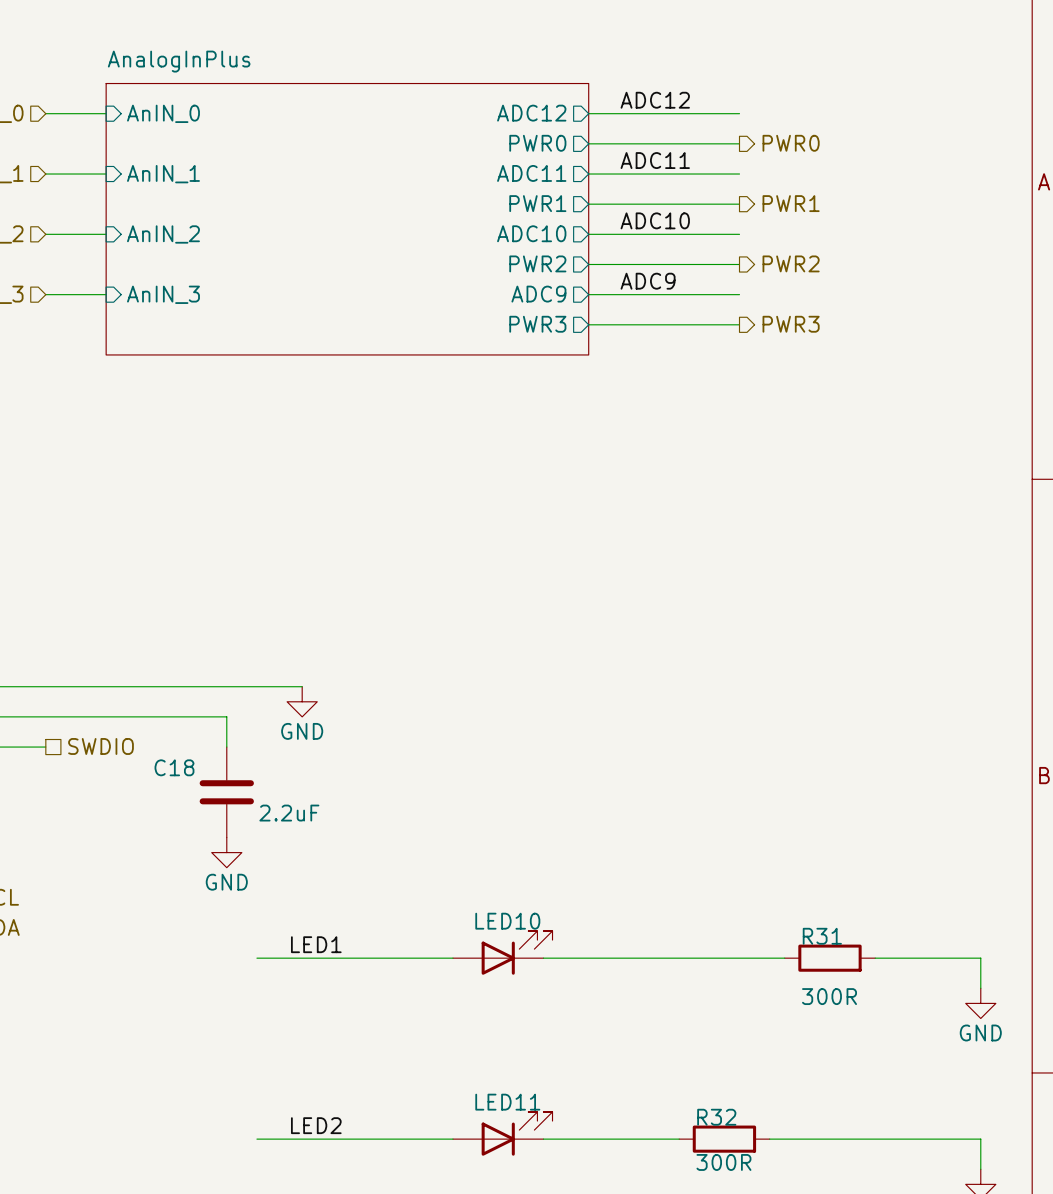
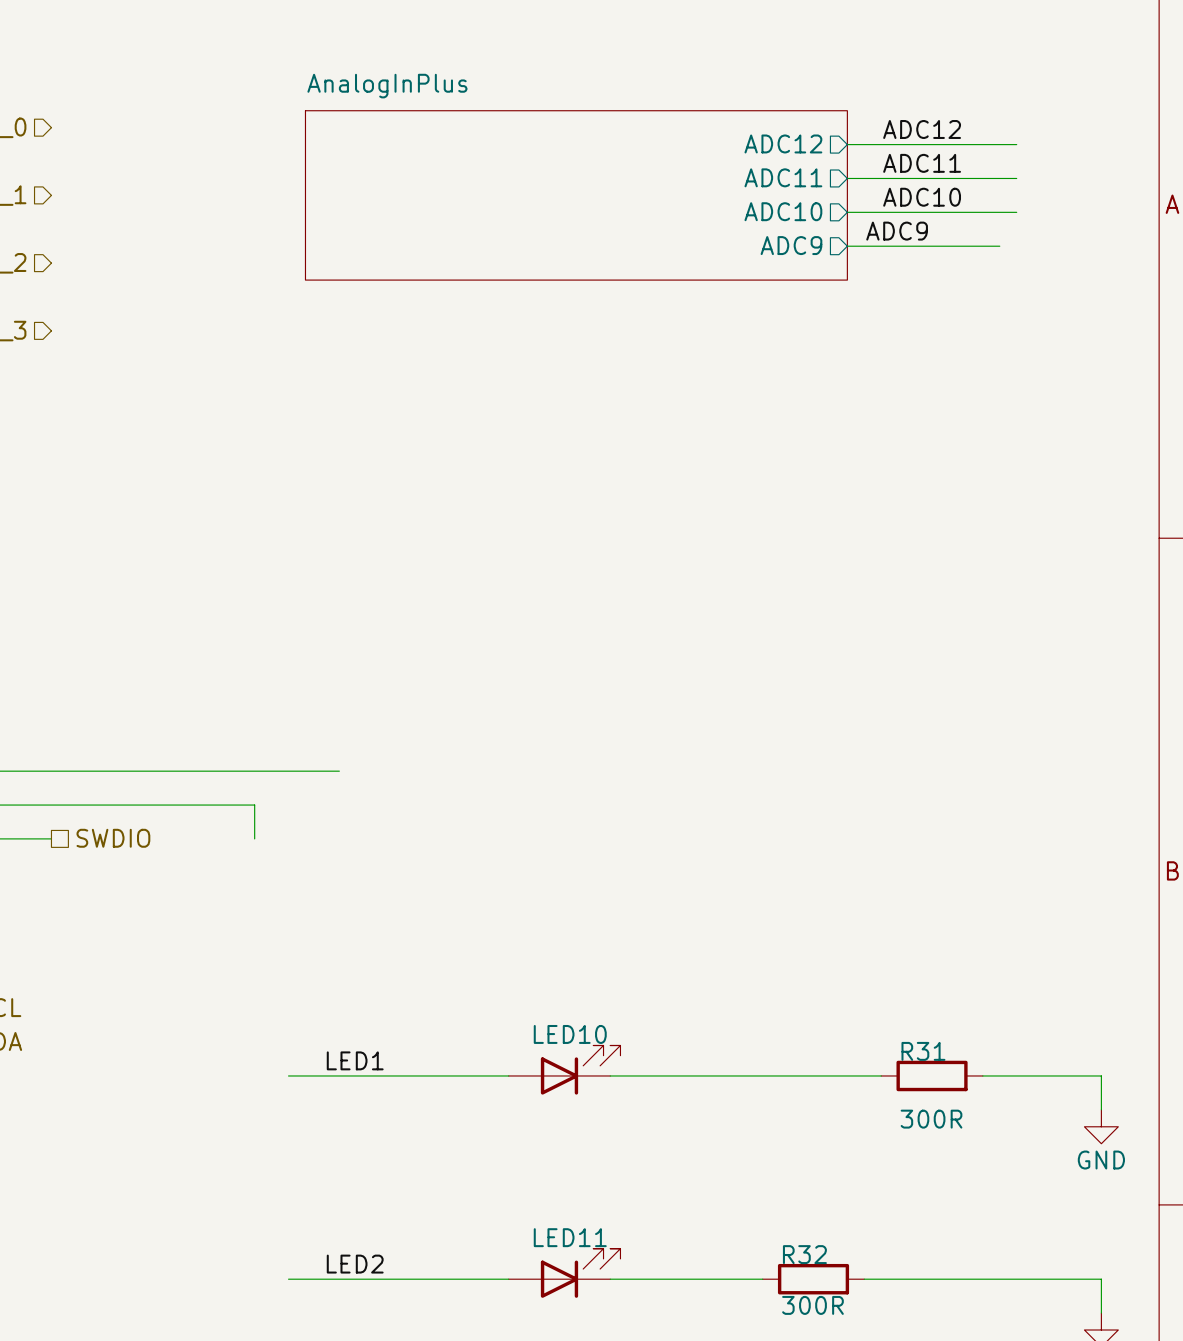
label position: ADC12 (655, 100) -> ADC12 (922, 129)
wire: (45, 113) (106, 113) -> none
sheet pin: AnIN_0 (163, 113) -> none
sheet pin position: ADC12 (531, 113) -> ADC12 (783, 143)
wire: (588, 113) (739, 113) -> (847, 144) (1016, 144)
sheet pin: PWR0 (537, 143) -> none
wire: (588, 143) (739, 143) -> (847, 178) (1016, 178)
hierarchical label: PWR0 (791, 143) -> none
label position: ADC11 (655, 160) -> ADC11 (922, 163)
sheet pin position: ADC11 (531, 173) -> ADC11 (783, 177)
wire: (45, 174) (106, 174) -> none
sheet pin: AnIN_1 (163, 174) -> none
sheet AnalogInPlus: none -> (576, 195)
wire: (588, 174) (739, 174) -> (847, 212) (1016, 212)
sheet pin: PWR1 (537, 203) -> none
hierarchical label: PWR1 (791, 203) -> none
wire: (588, 204) (739, 204) -> none
sheet AnalogInPlus: (347, 219) -> none
wire: none -> (847, 246) (999, 246)
label position: ADC10 (655, 220) -> ADC10 (922, 197)
sheet pin position: ADC10 (531, 233) -> ADC10 (783, 211)
wire: (45, 234) (106, 234) -> none
sheet pin: AnIN_2 (163, 234) -> none
wire: (588, 234) (739, 234) -> none
sheet pin: PWR2 (537, 263) -> none
hierarchical label: PWR2 (791, 263) -> none
wire: (588, 264) (739, 264) -> none
label position: ADC9 (648, 281) -> ADC9 (897, 231)
wire: (45, 294) (106, 294) -> none
sheet pin: AnIN_3 (163, 294) -> none
sheet pin position: ADC9 (538, 294) -> ADC9 (791, 245)
wire: (588, 294) (739, 294) -> none
sheet pin: PWR3 (537, 324) -> none
wire: (588, 324) (739, 324) -> none
hierarchical label: PWR3 (791, 324) -> none
power symbol: GND (302, 701) -> none
C18: (226, 792) -> none
power symbol: GND (226, 852) -> none

